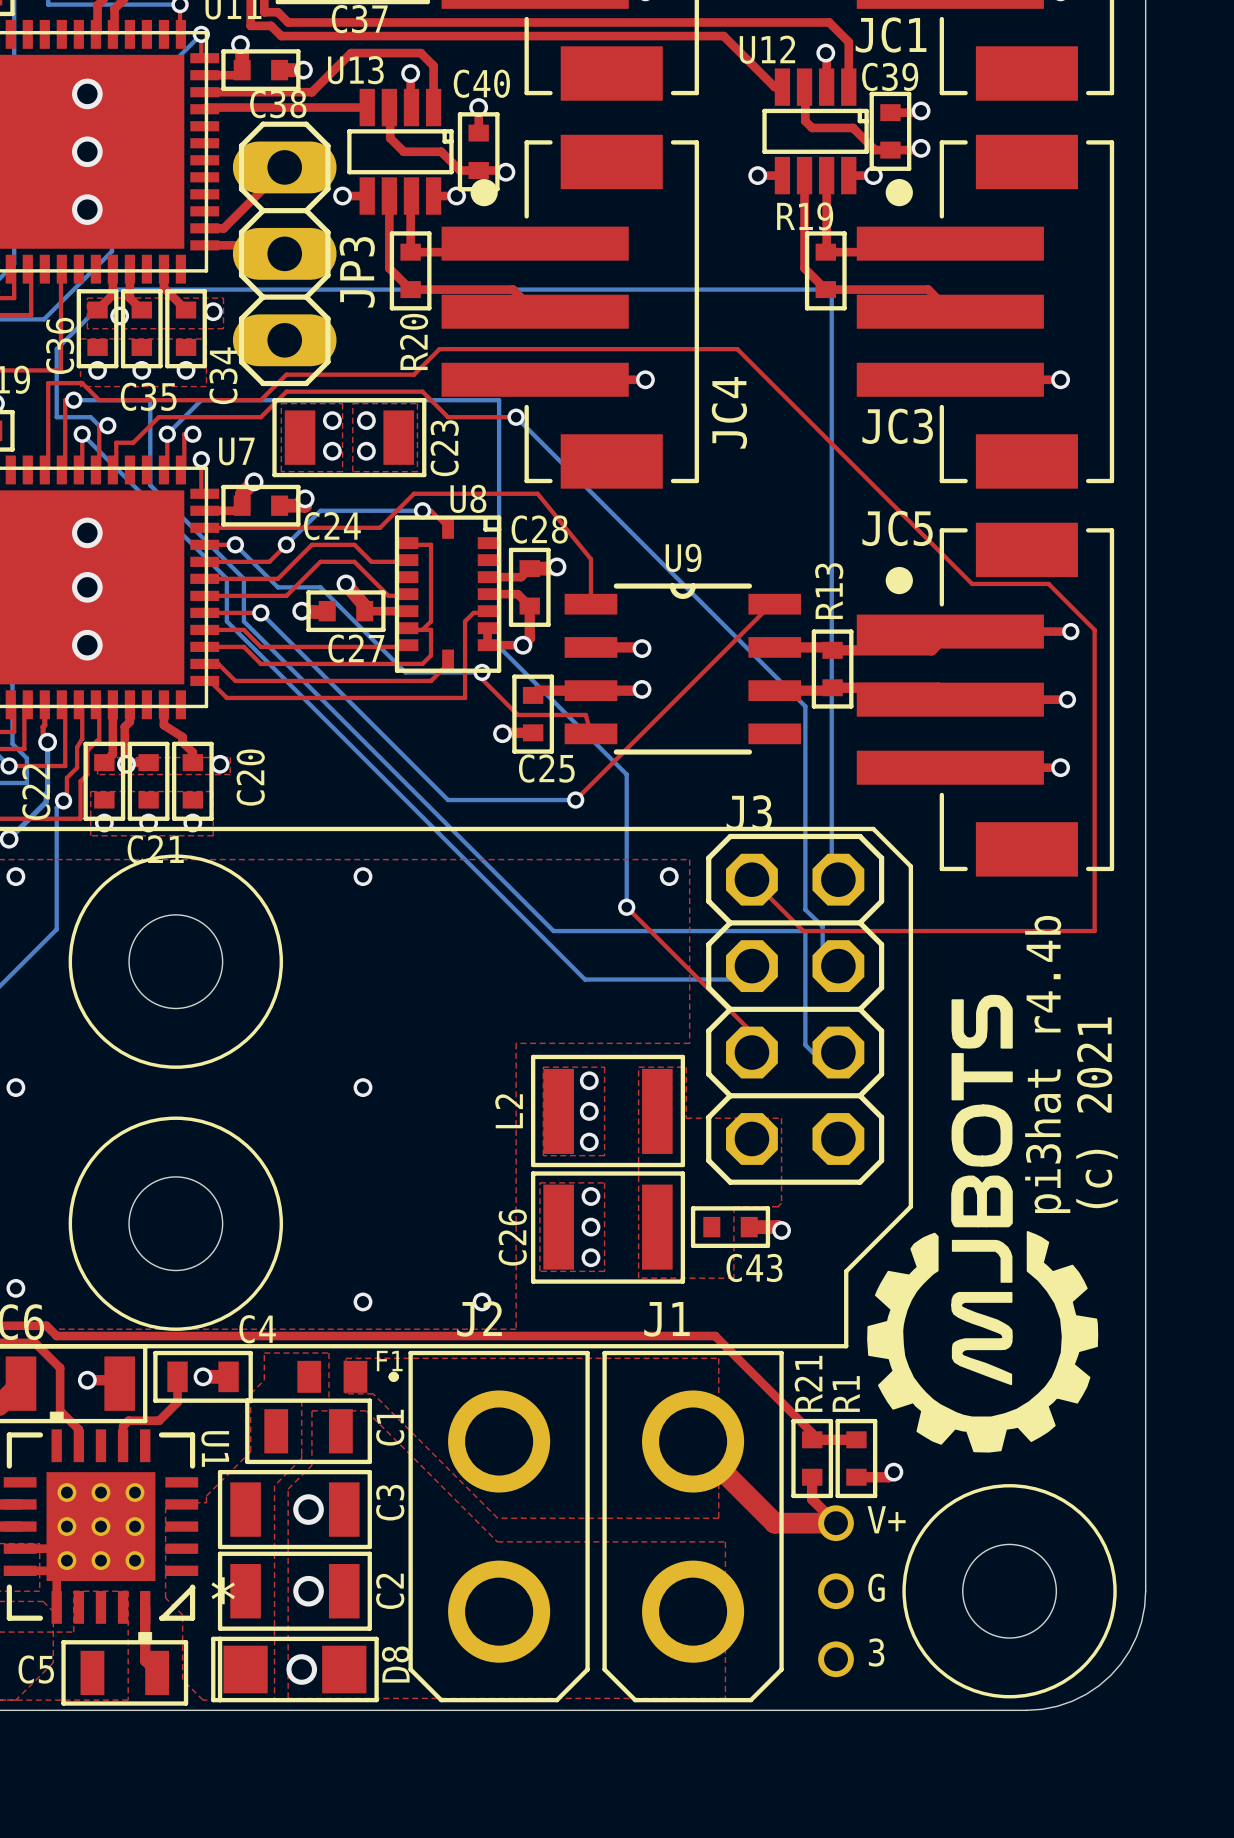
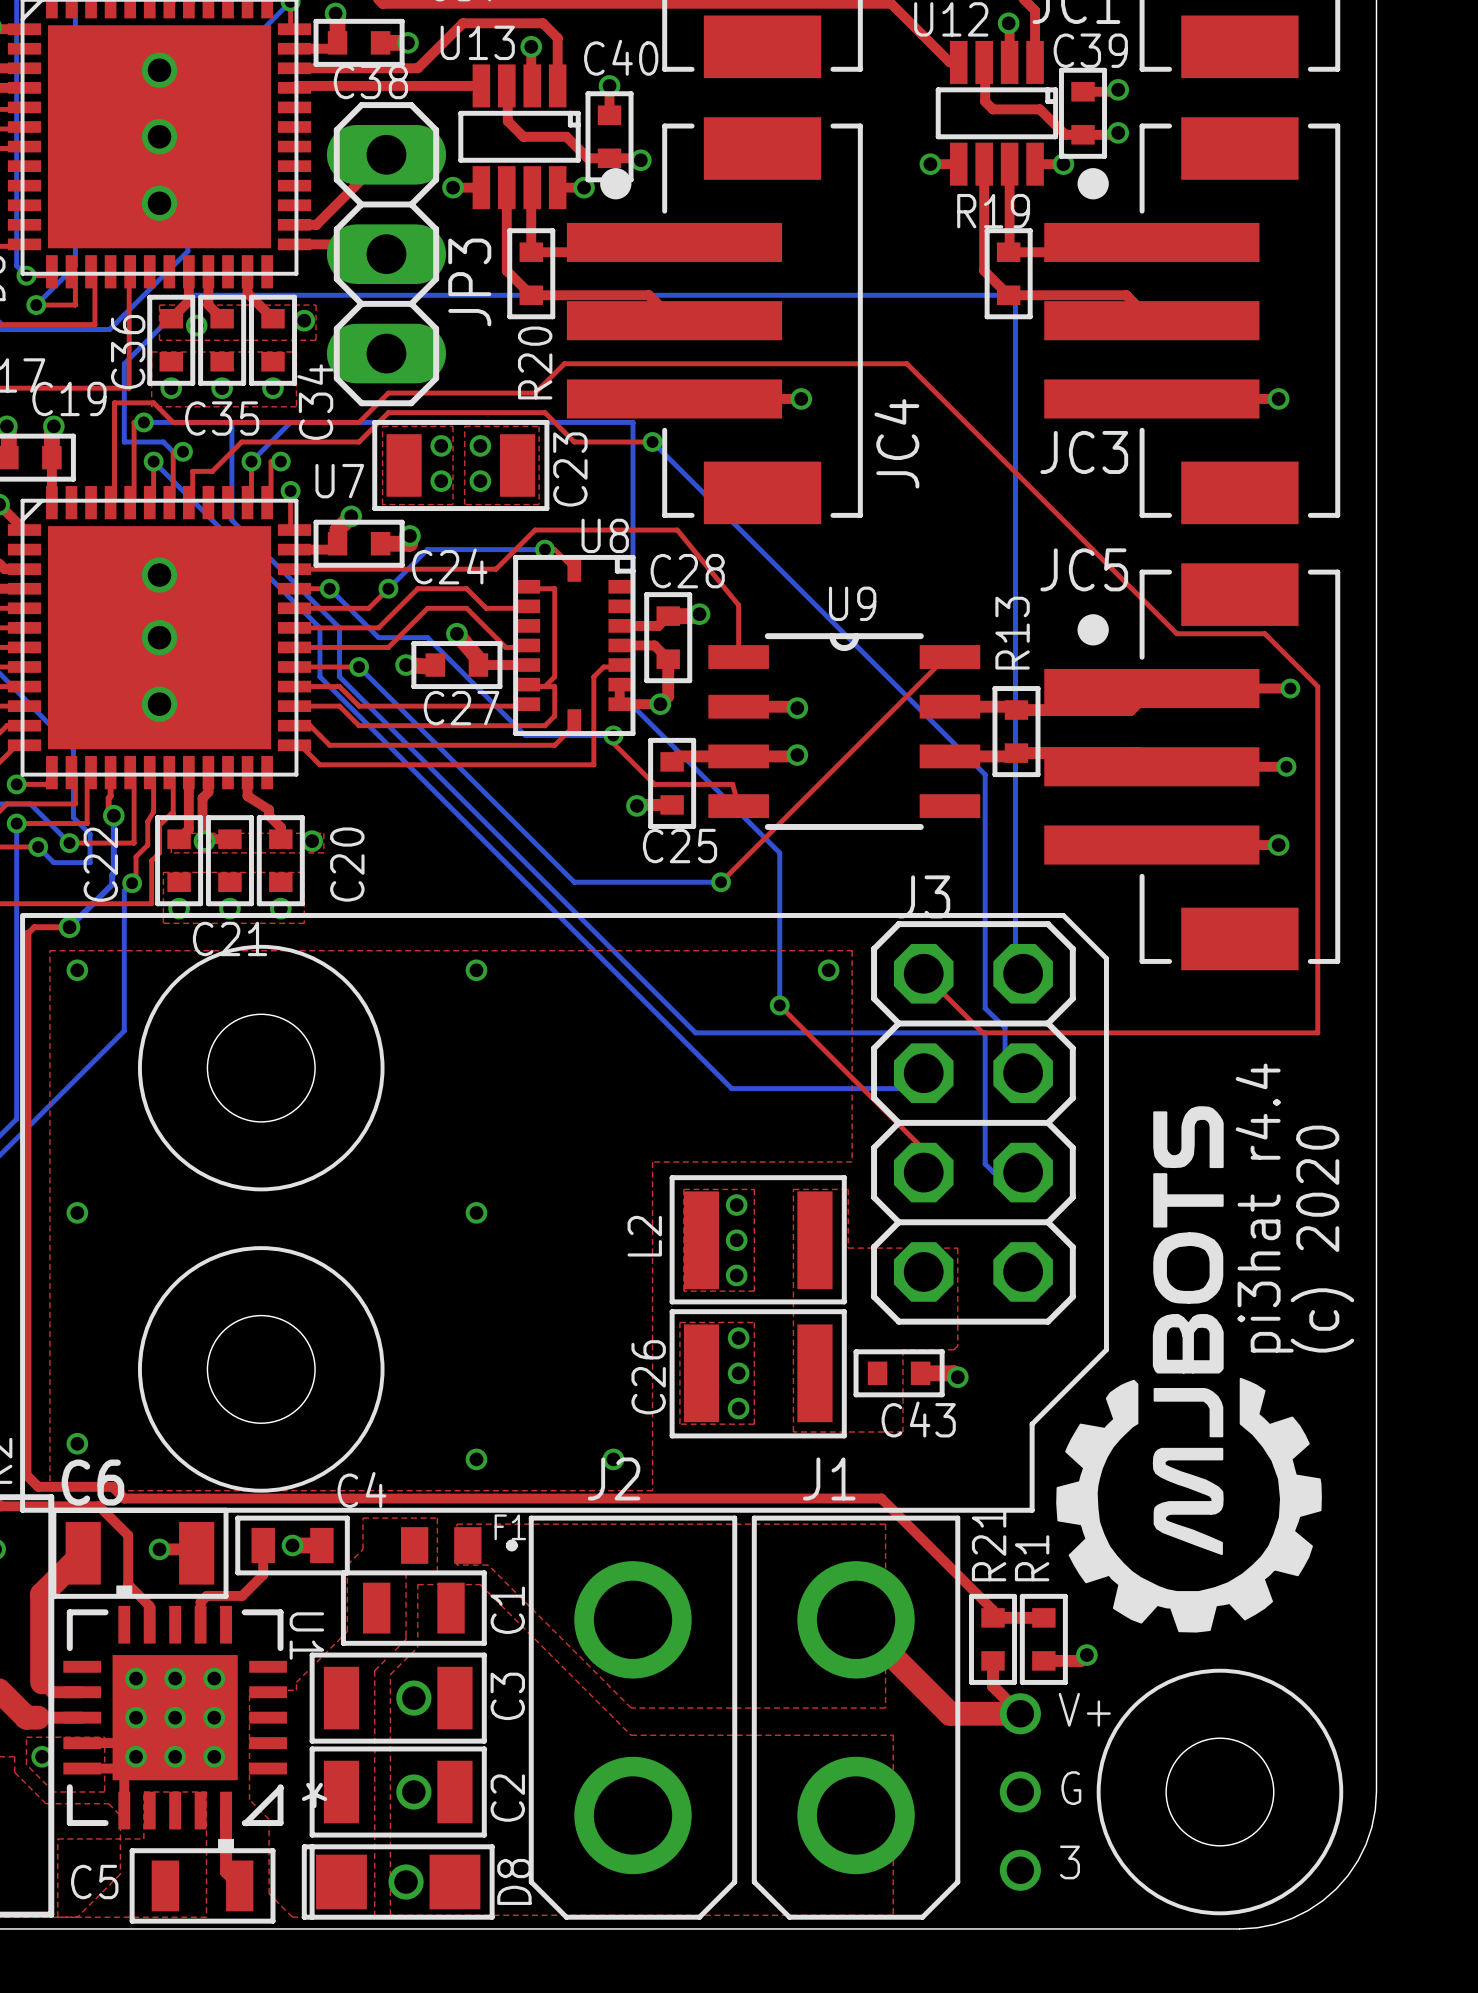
text: pi3hat r4.4b (1047, 1064) -> pi3hat r4.4 (1264, 1208)
text: (c) 2021 (1097, 1112) -> (c) 2020 (1322, 1239)

